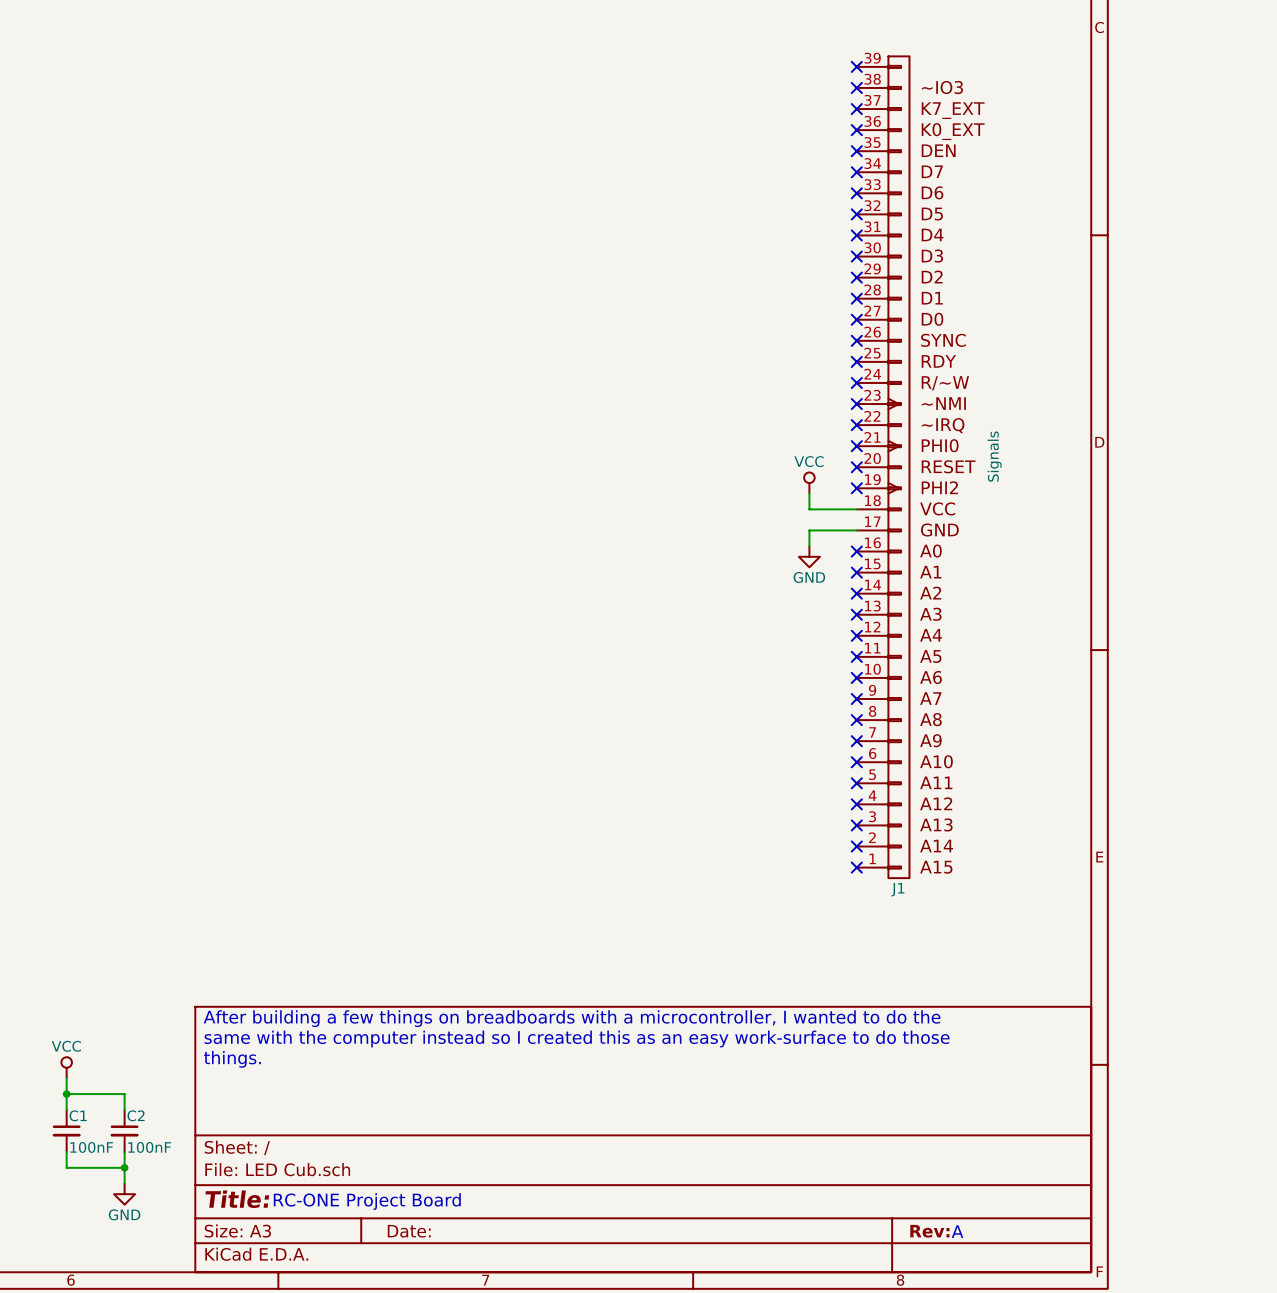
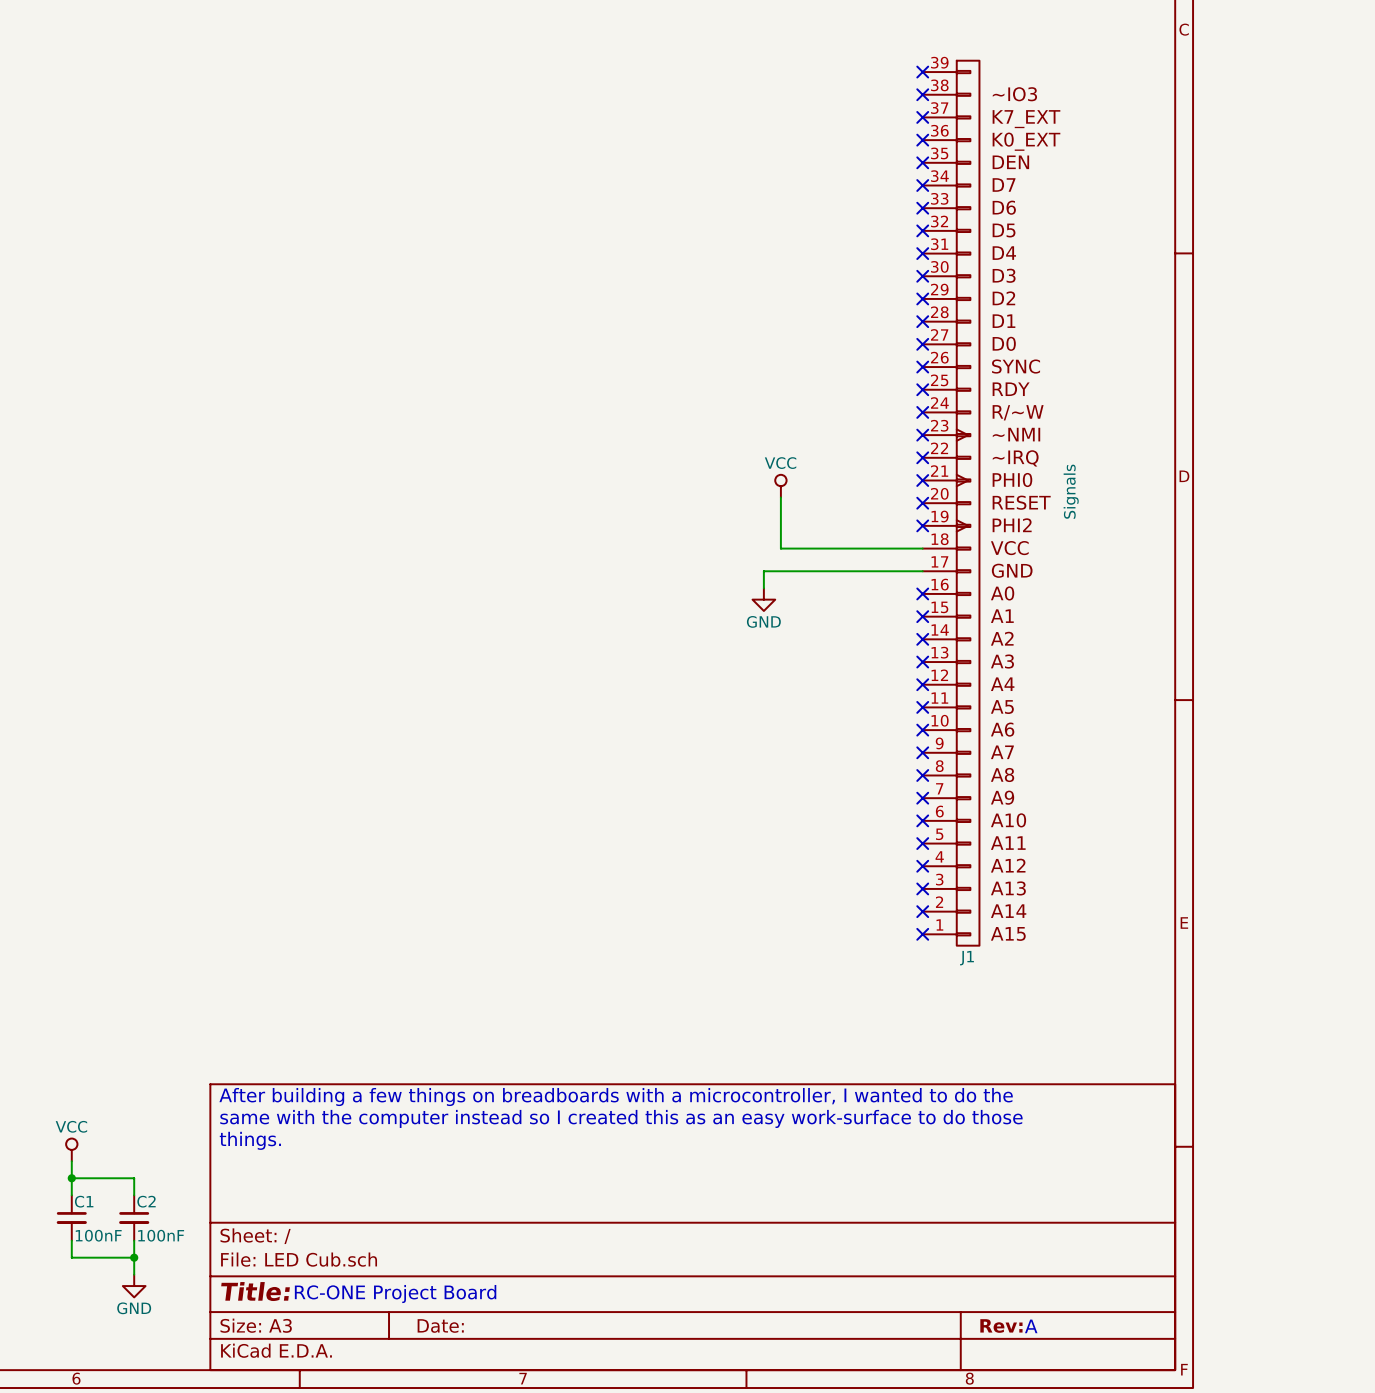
power symbol position: VCC (809, 483) -> VCC (780, 486)
wire: (809, 493) (809, 509) -> (780, 497) (780, 548) (871, 548)
wire: (809, 530) (809, 546) -> (871, 571) (763, 571) (763, 588)
power symbol position: GND (809, 556) -> GND (763, 599)

